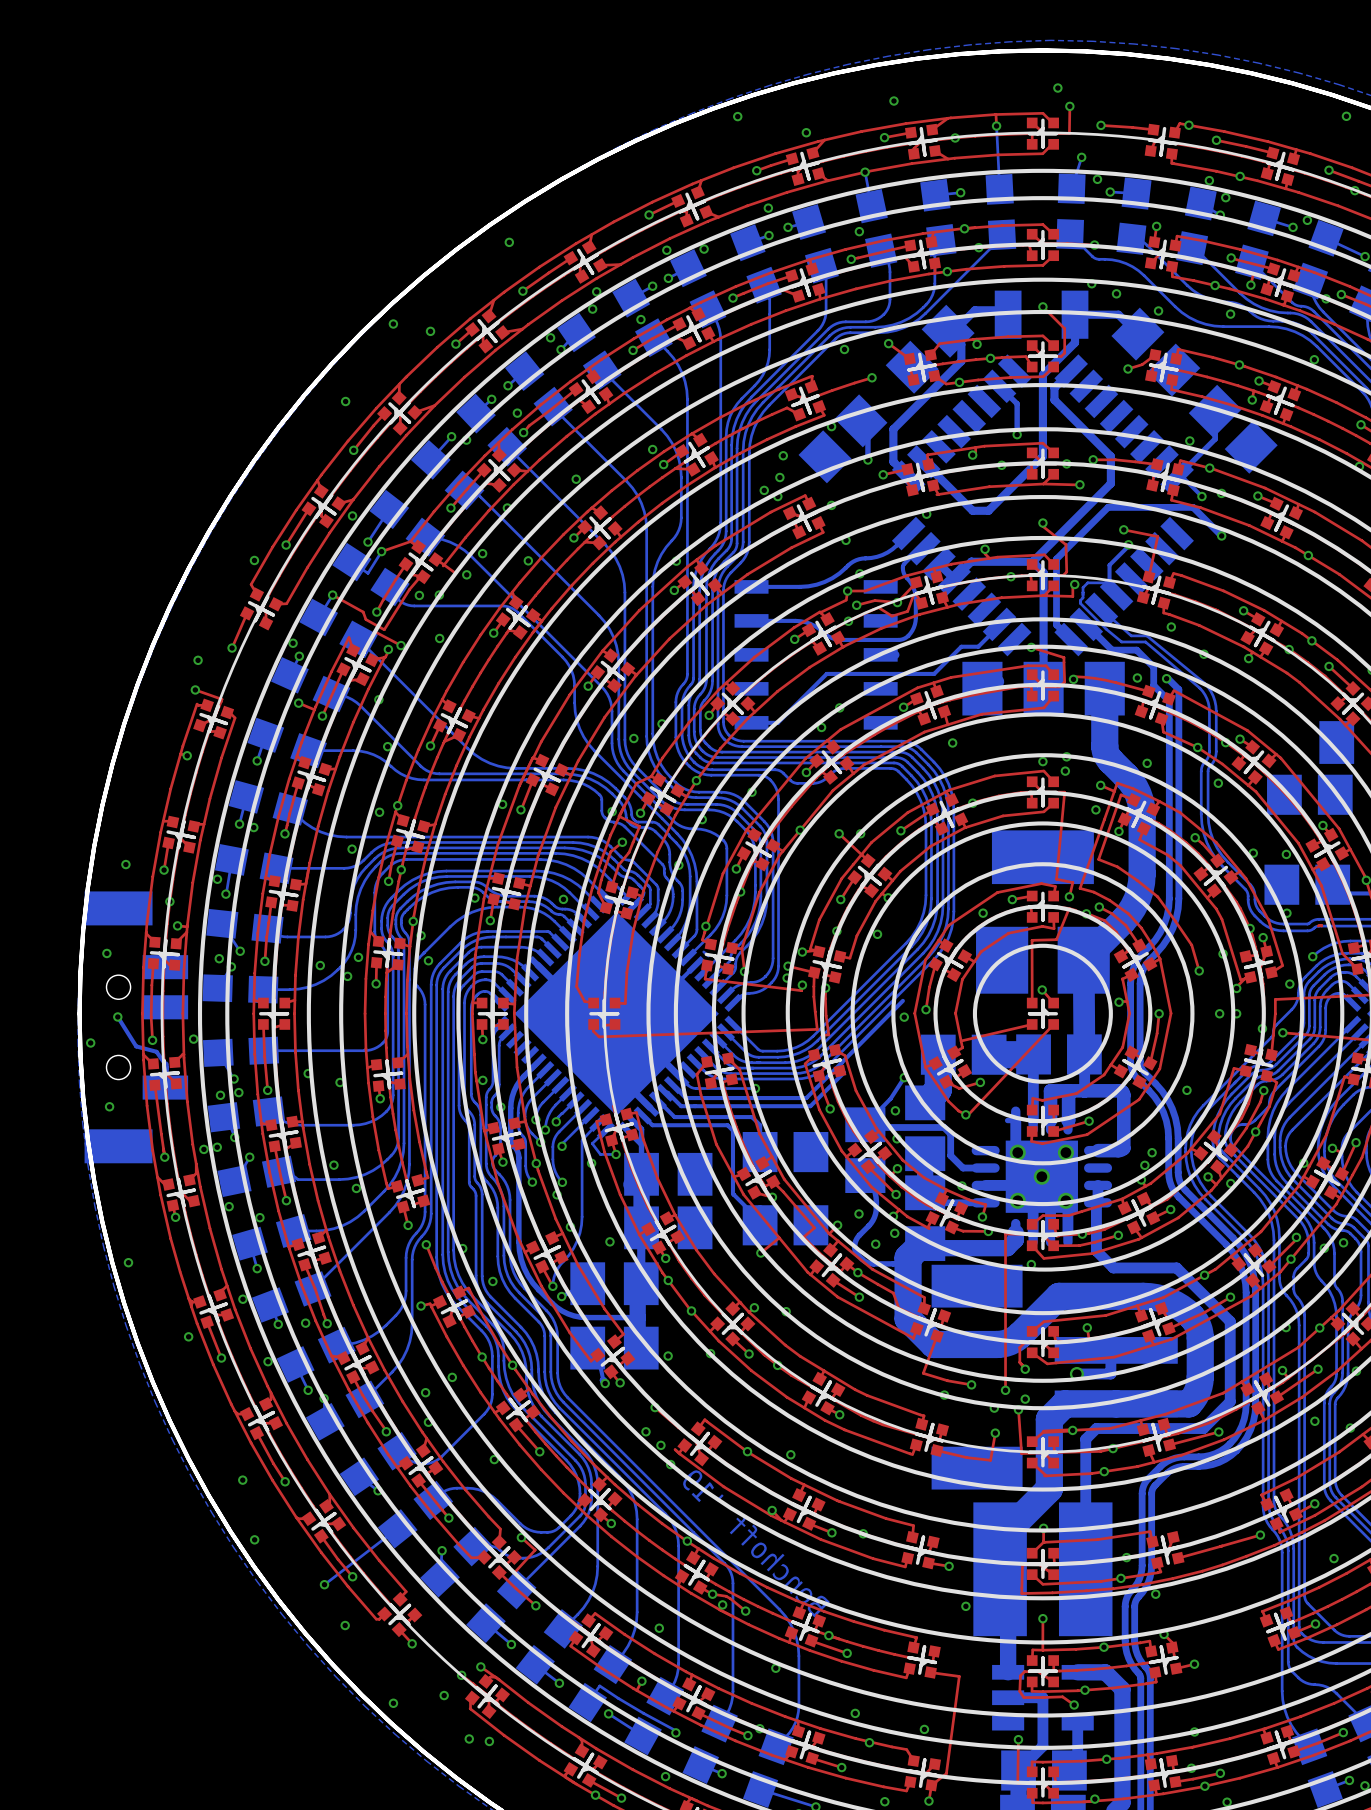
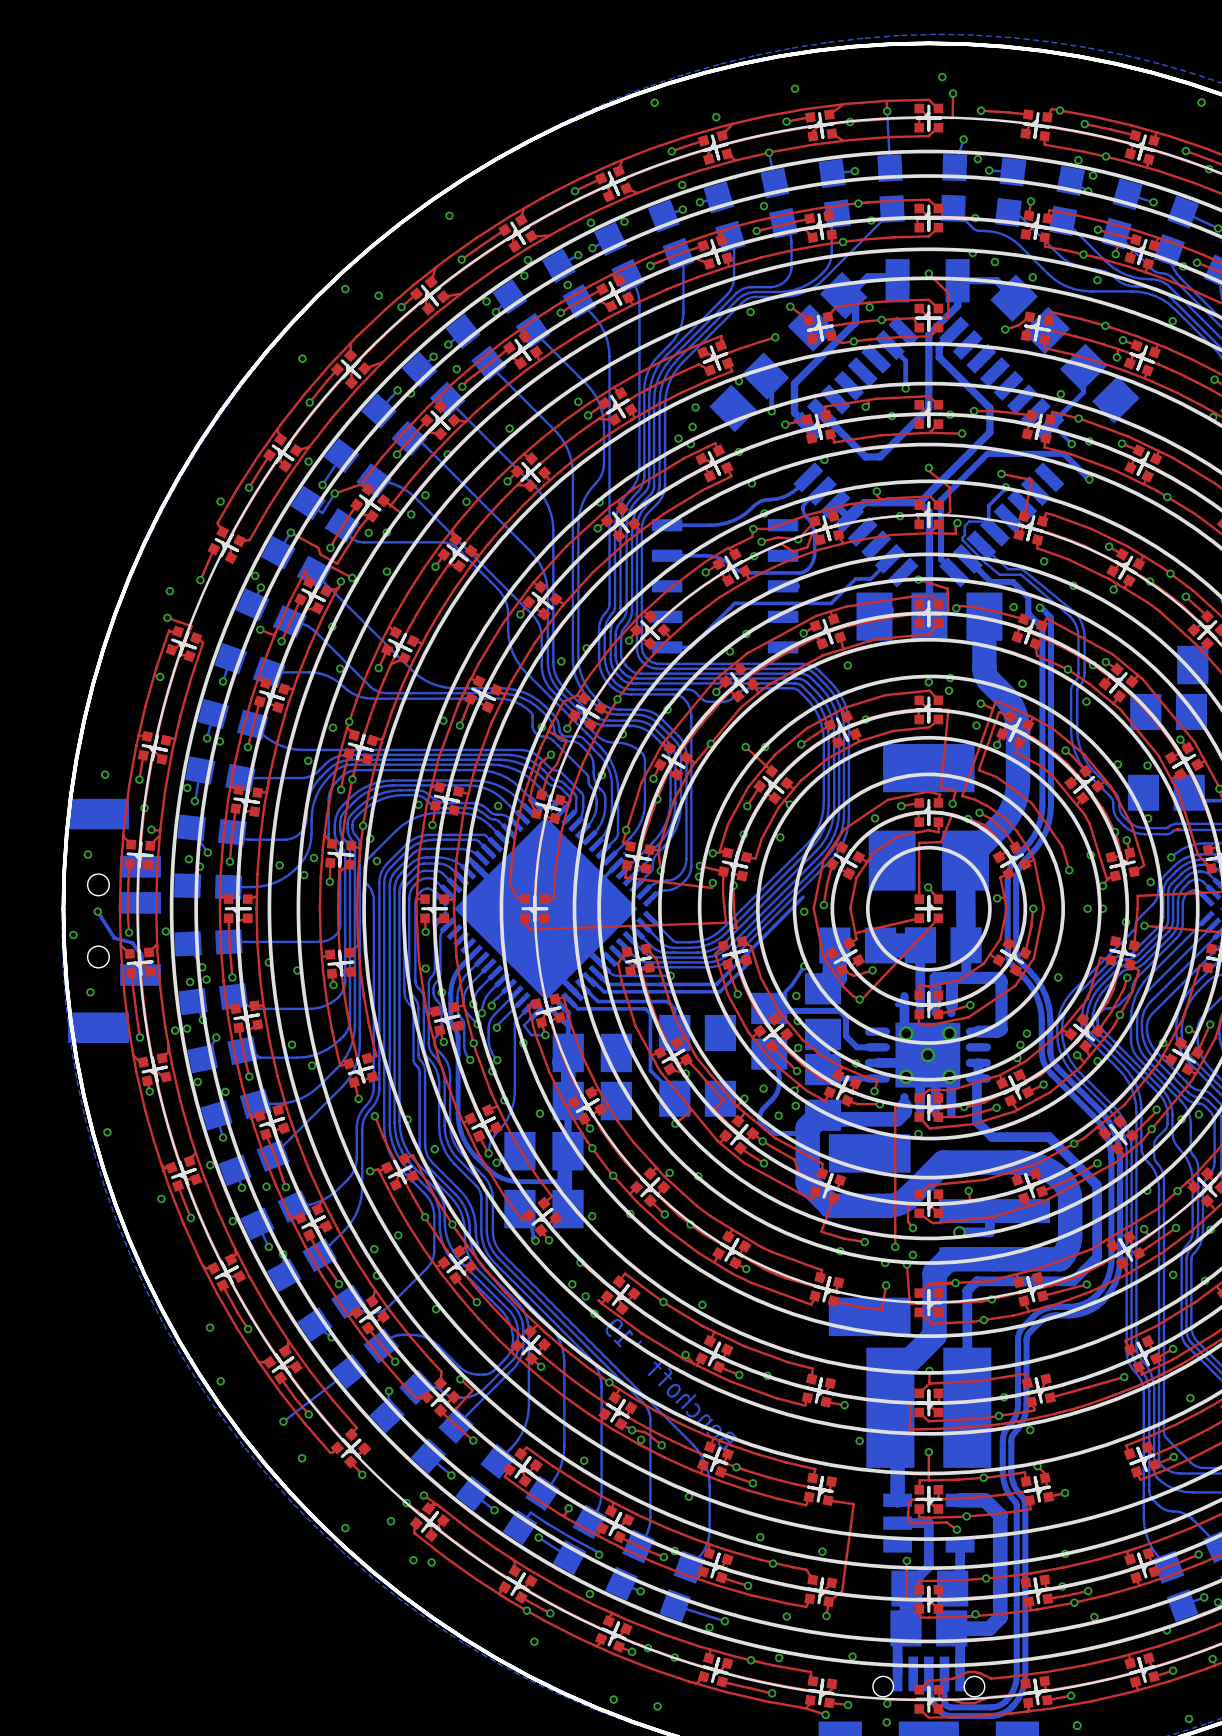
via: (1307, 220) -> none

